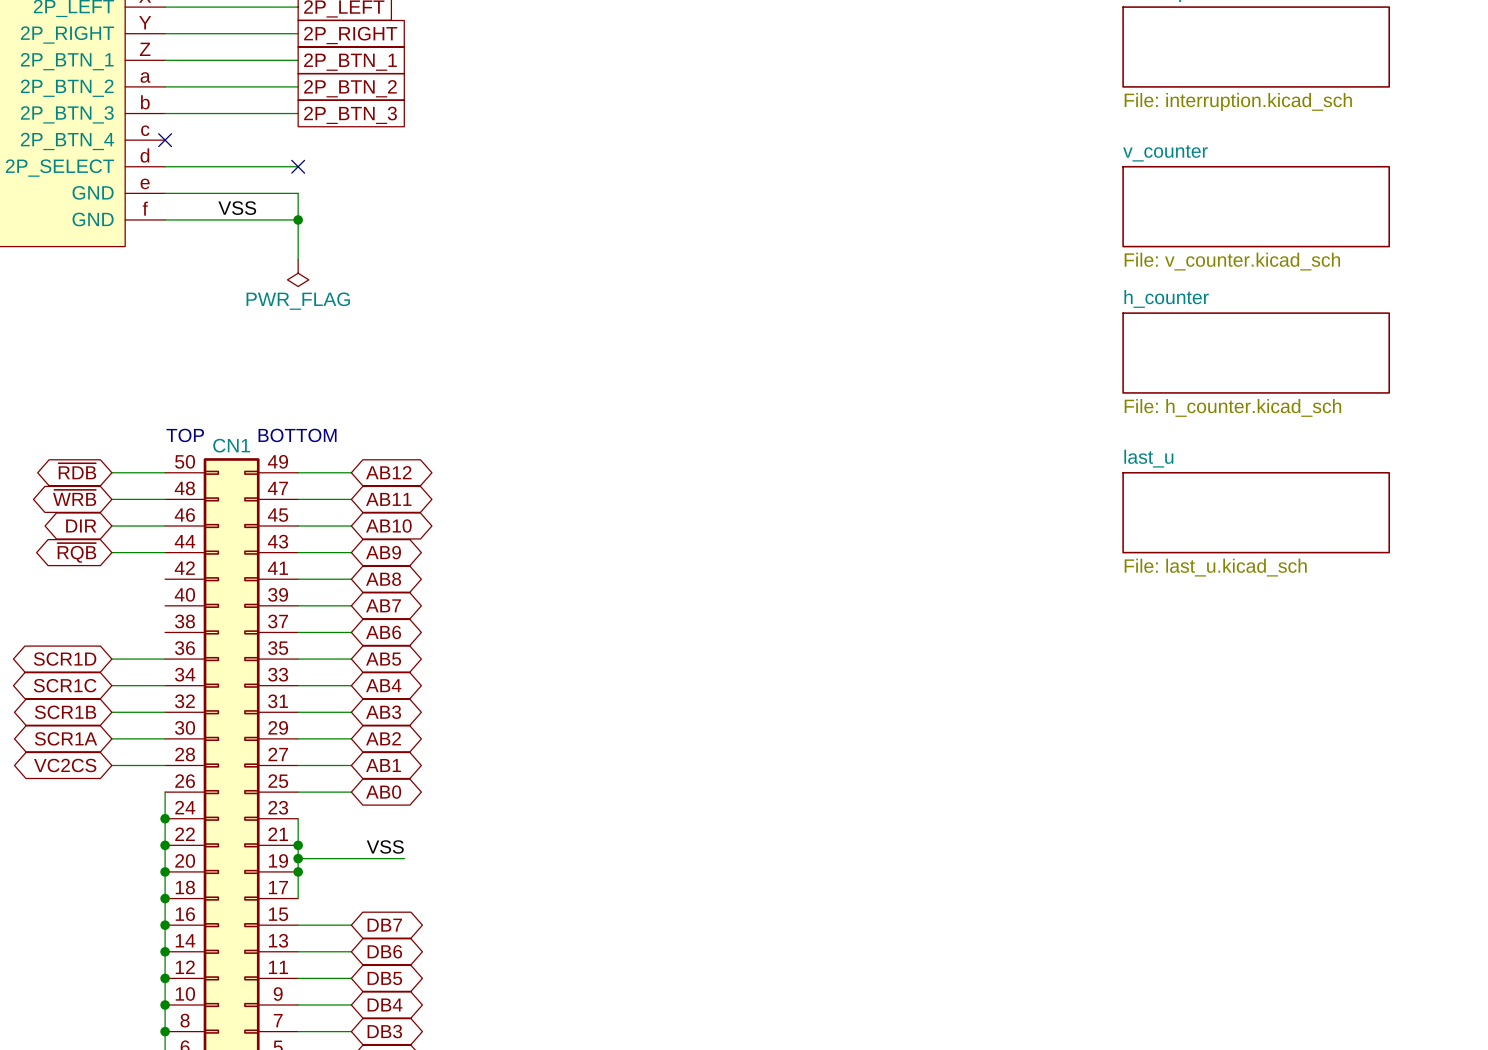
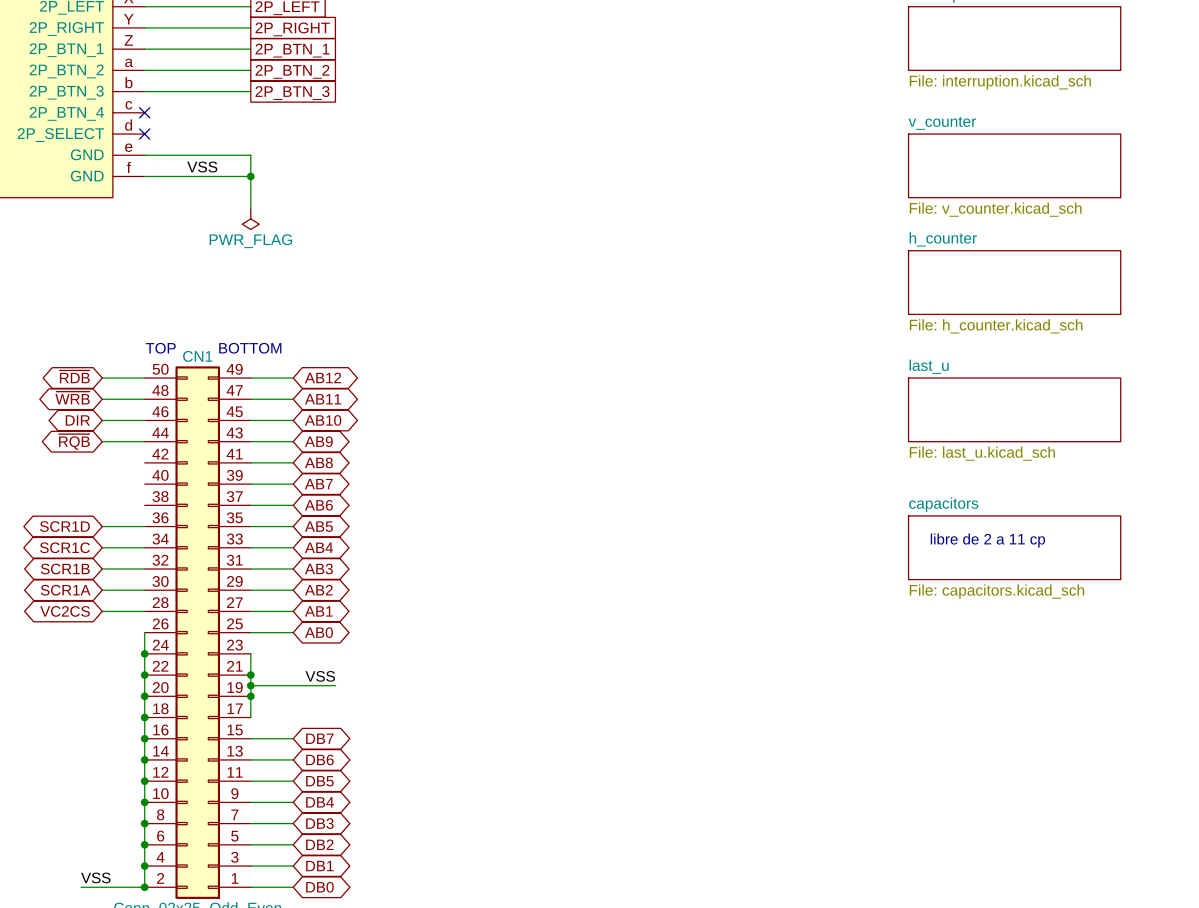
wire: (165, 166) (298, 166) -> none
no-connect mark: none -> (144, 134)
no-connect mark: (298, 166) -> none
text: none -> libre de 2 a 11 cp (987, 540)
sheet capacitors: none -> File: capacitors.kicad_sch (1014, 547)

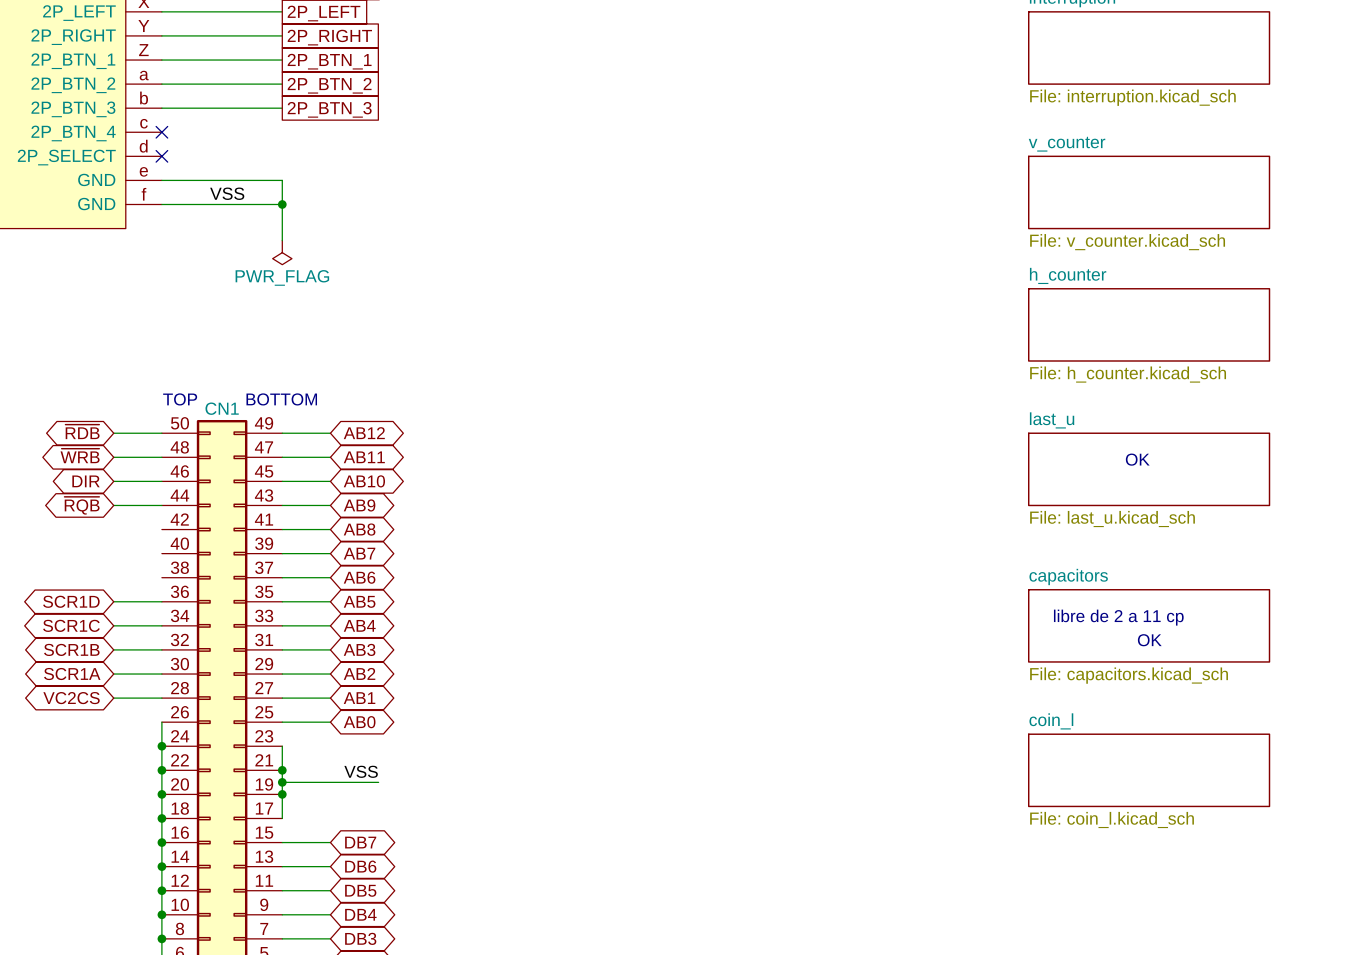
text: none -> OK (1137, 459)
text: none -> OK (1149, 640)
sheet coin_l: none -> File: coin_l.kicad_sch (1149, 770)

